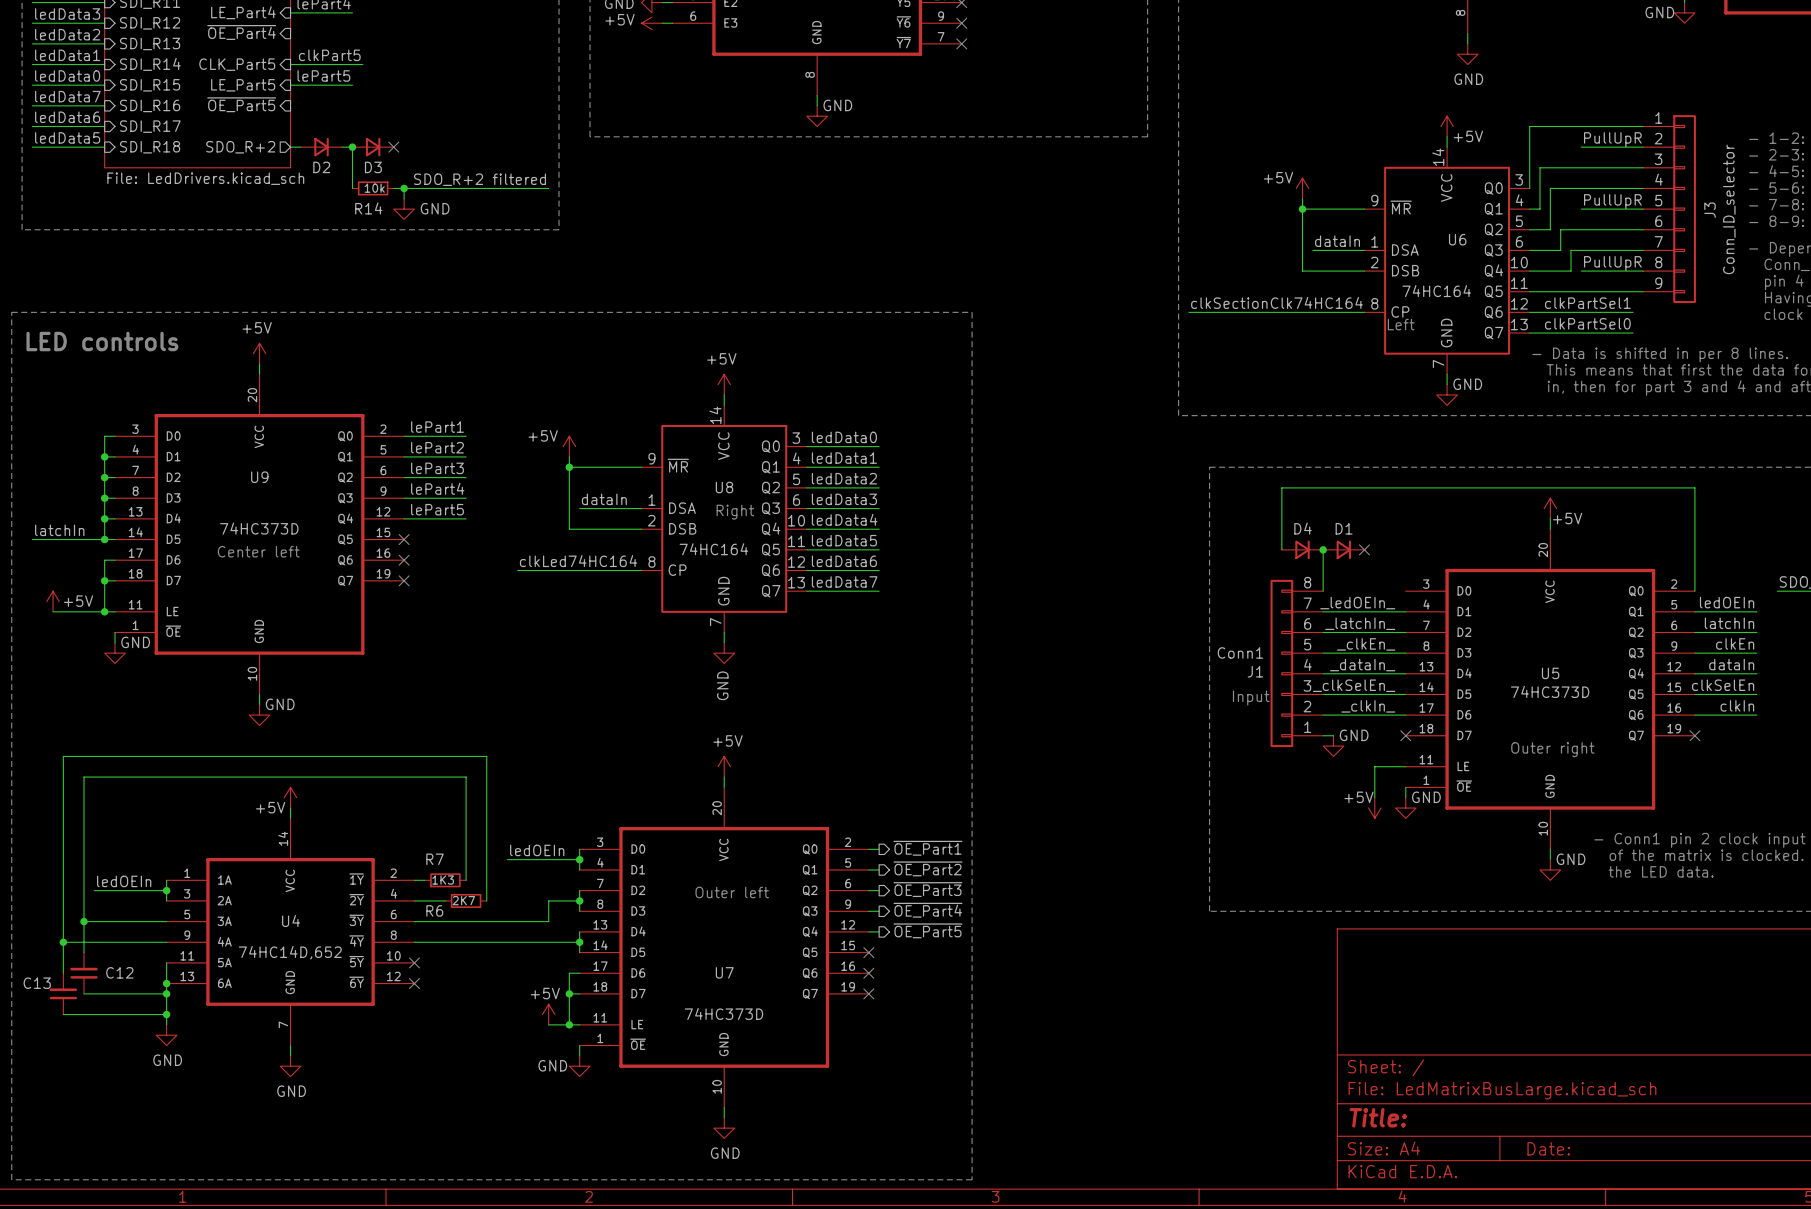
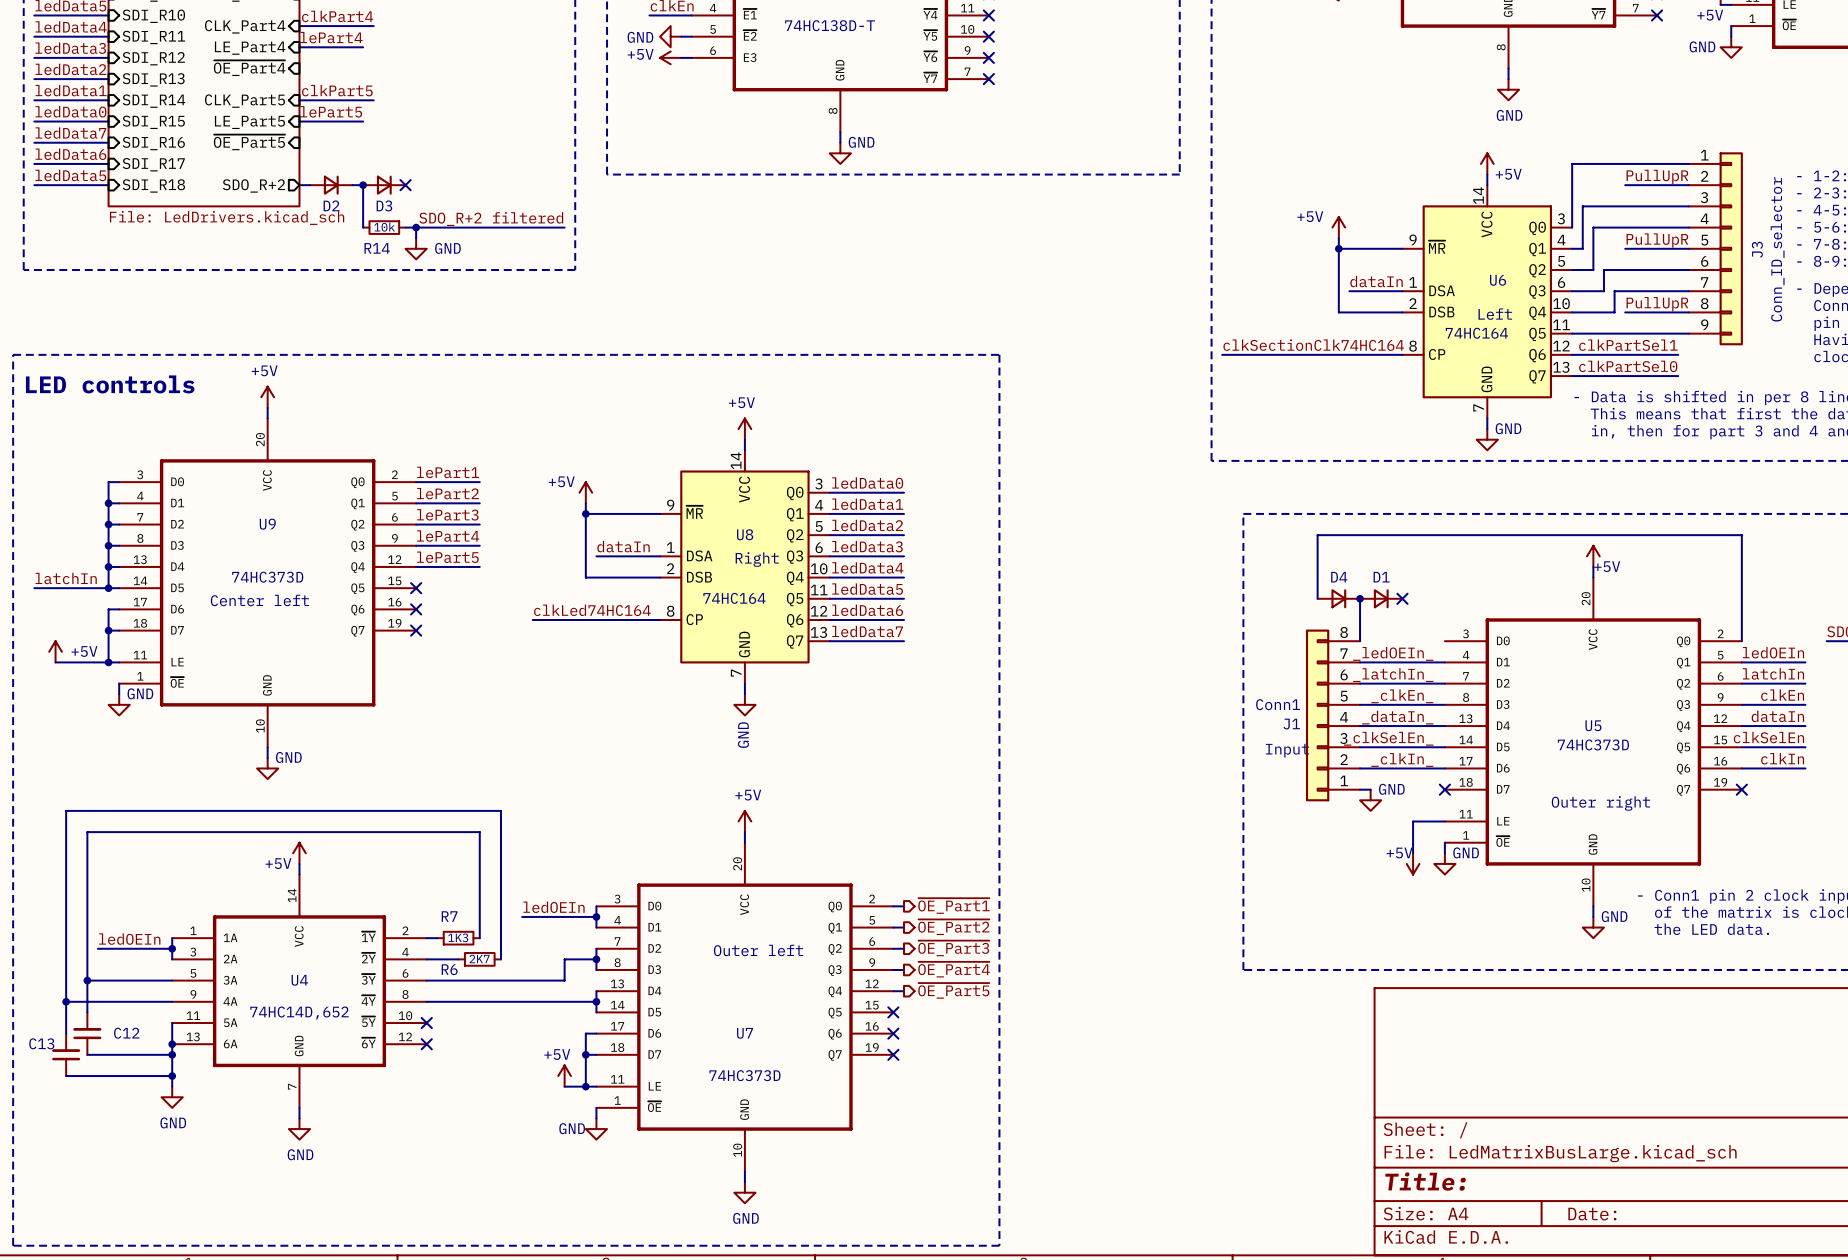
text position: Left (1401, 324) -> Left (1495, 314)

